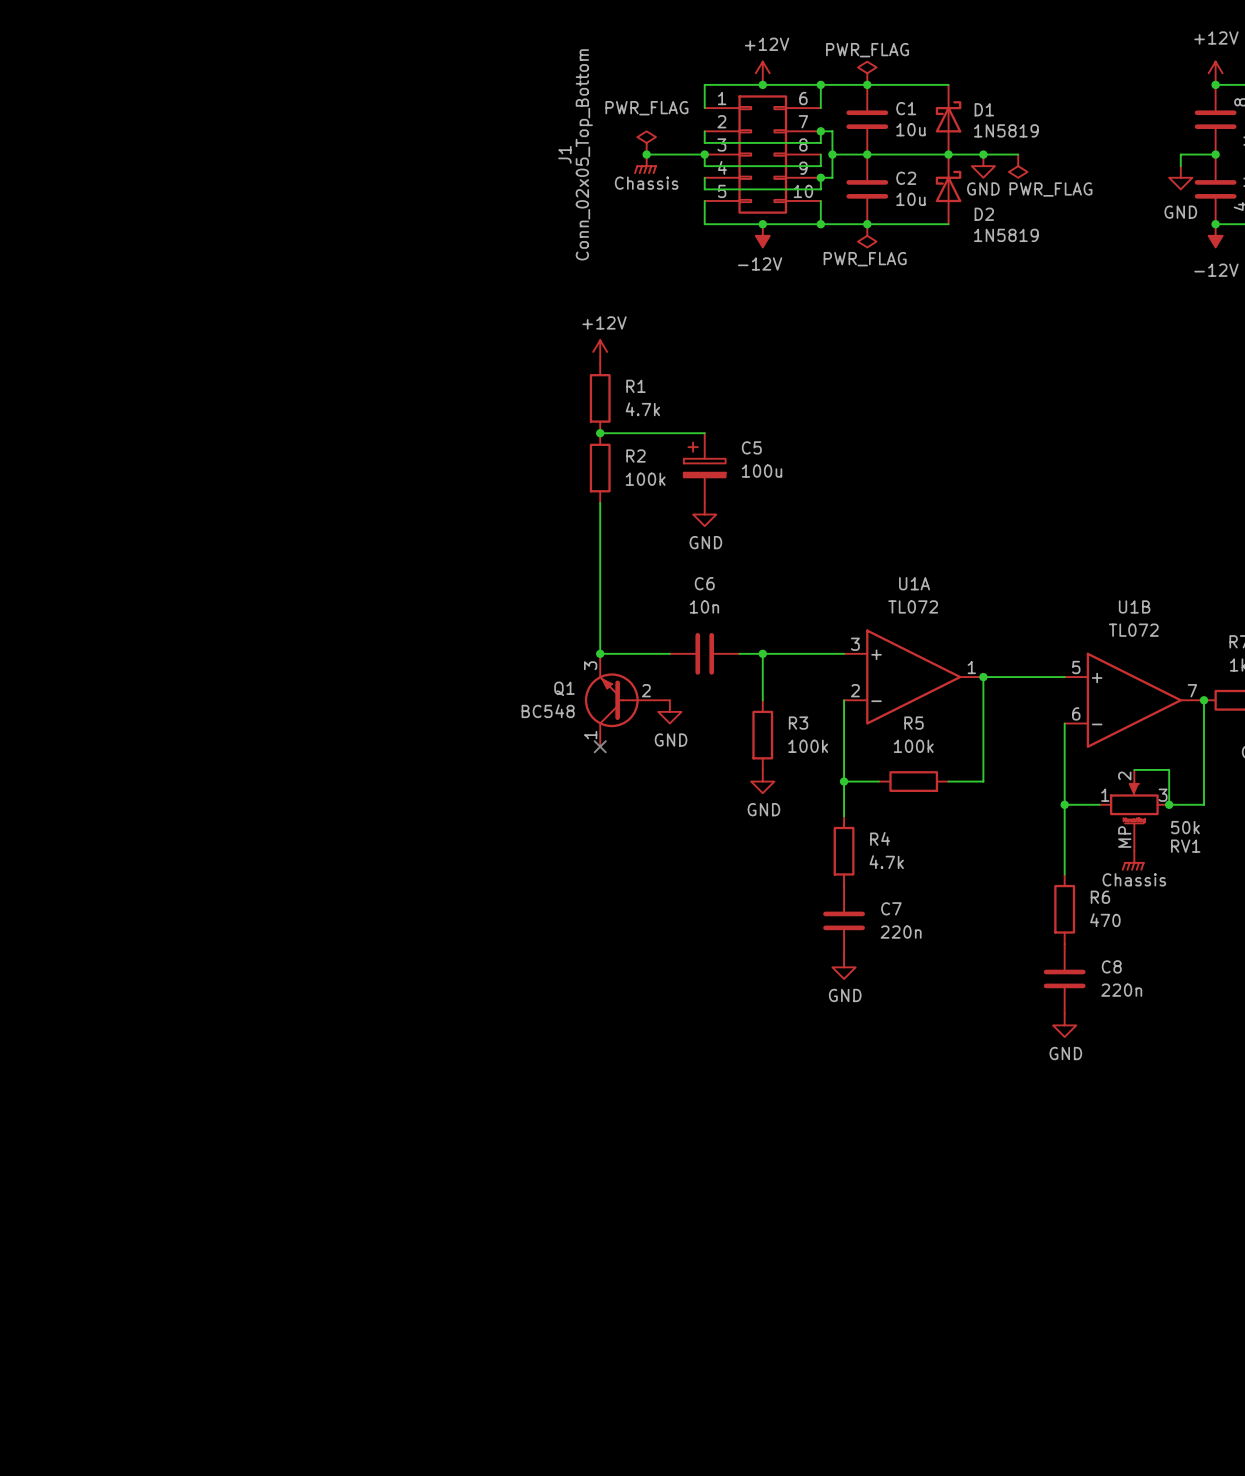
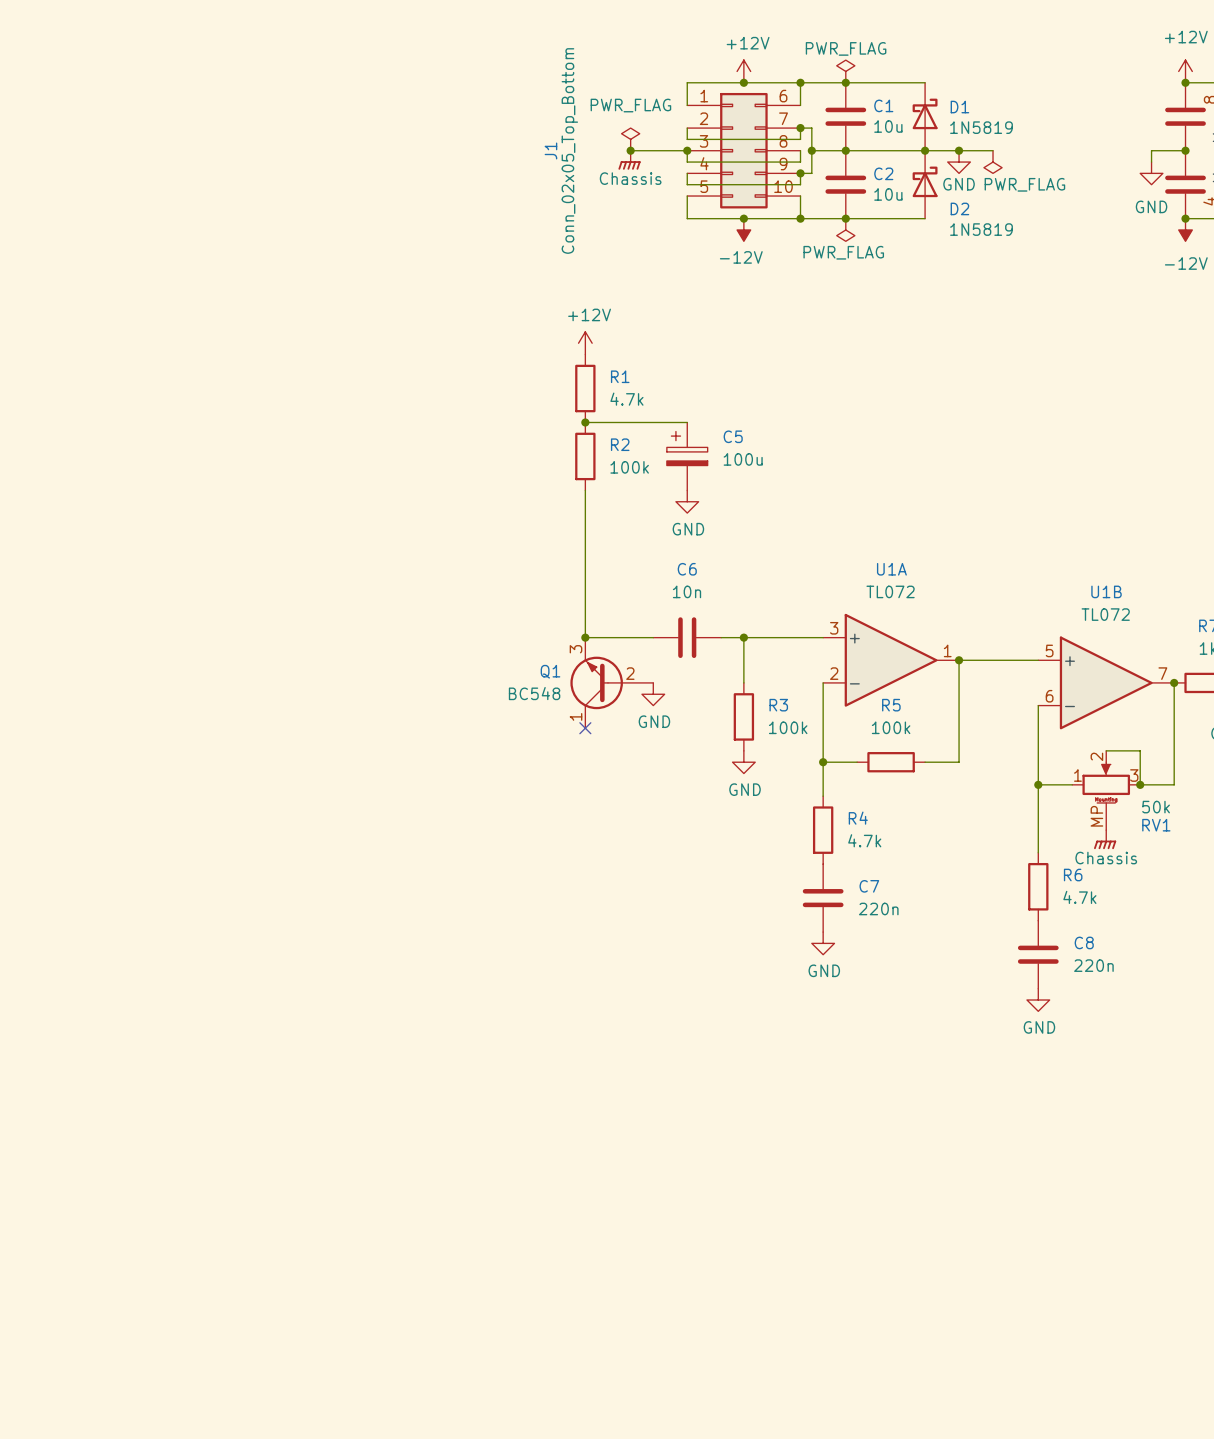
R6 value: 470 (1105, 920) -> 4.7k (1079, 897)

